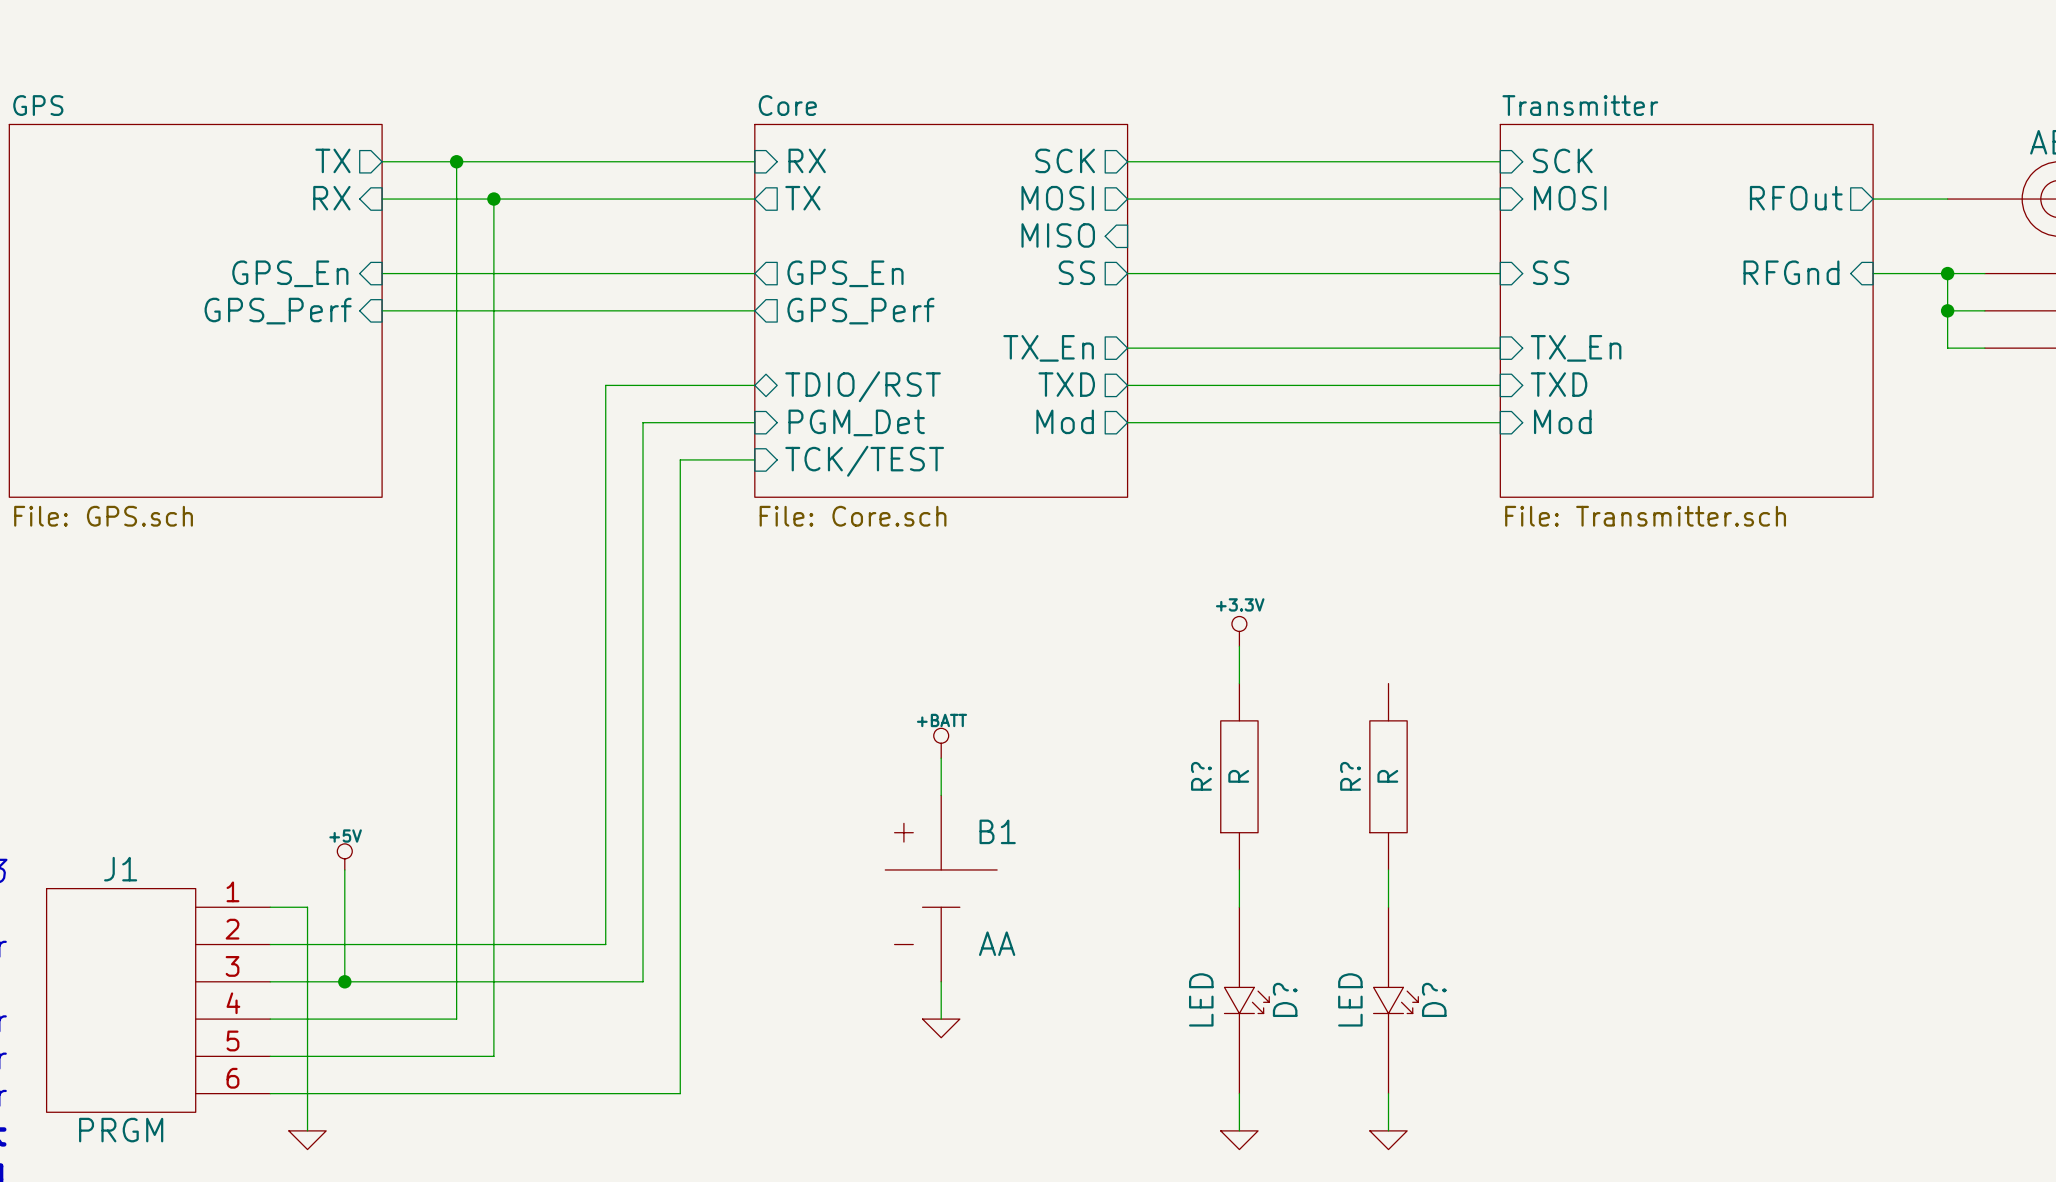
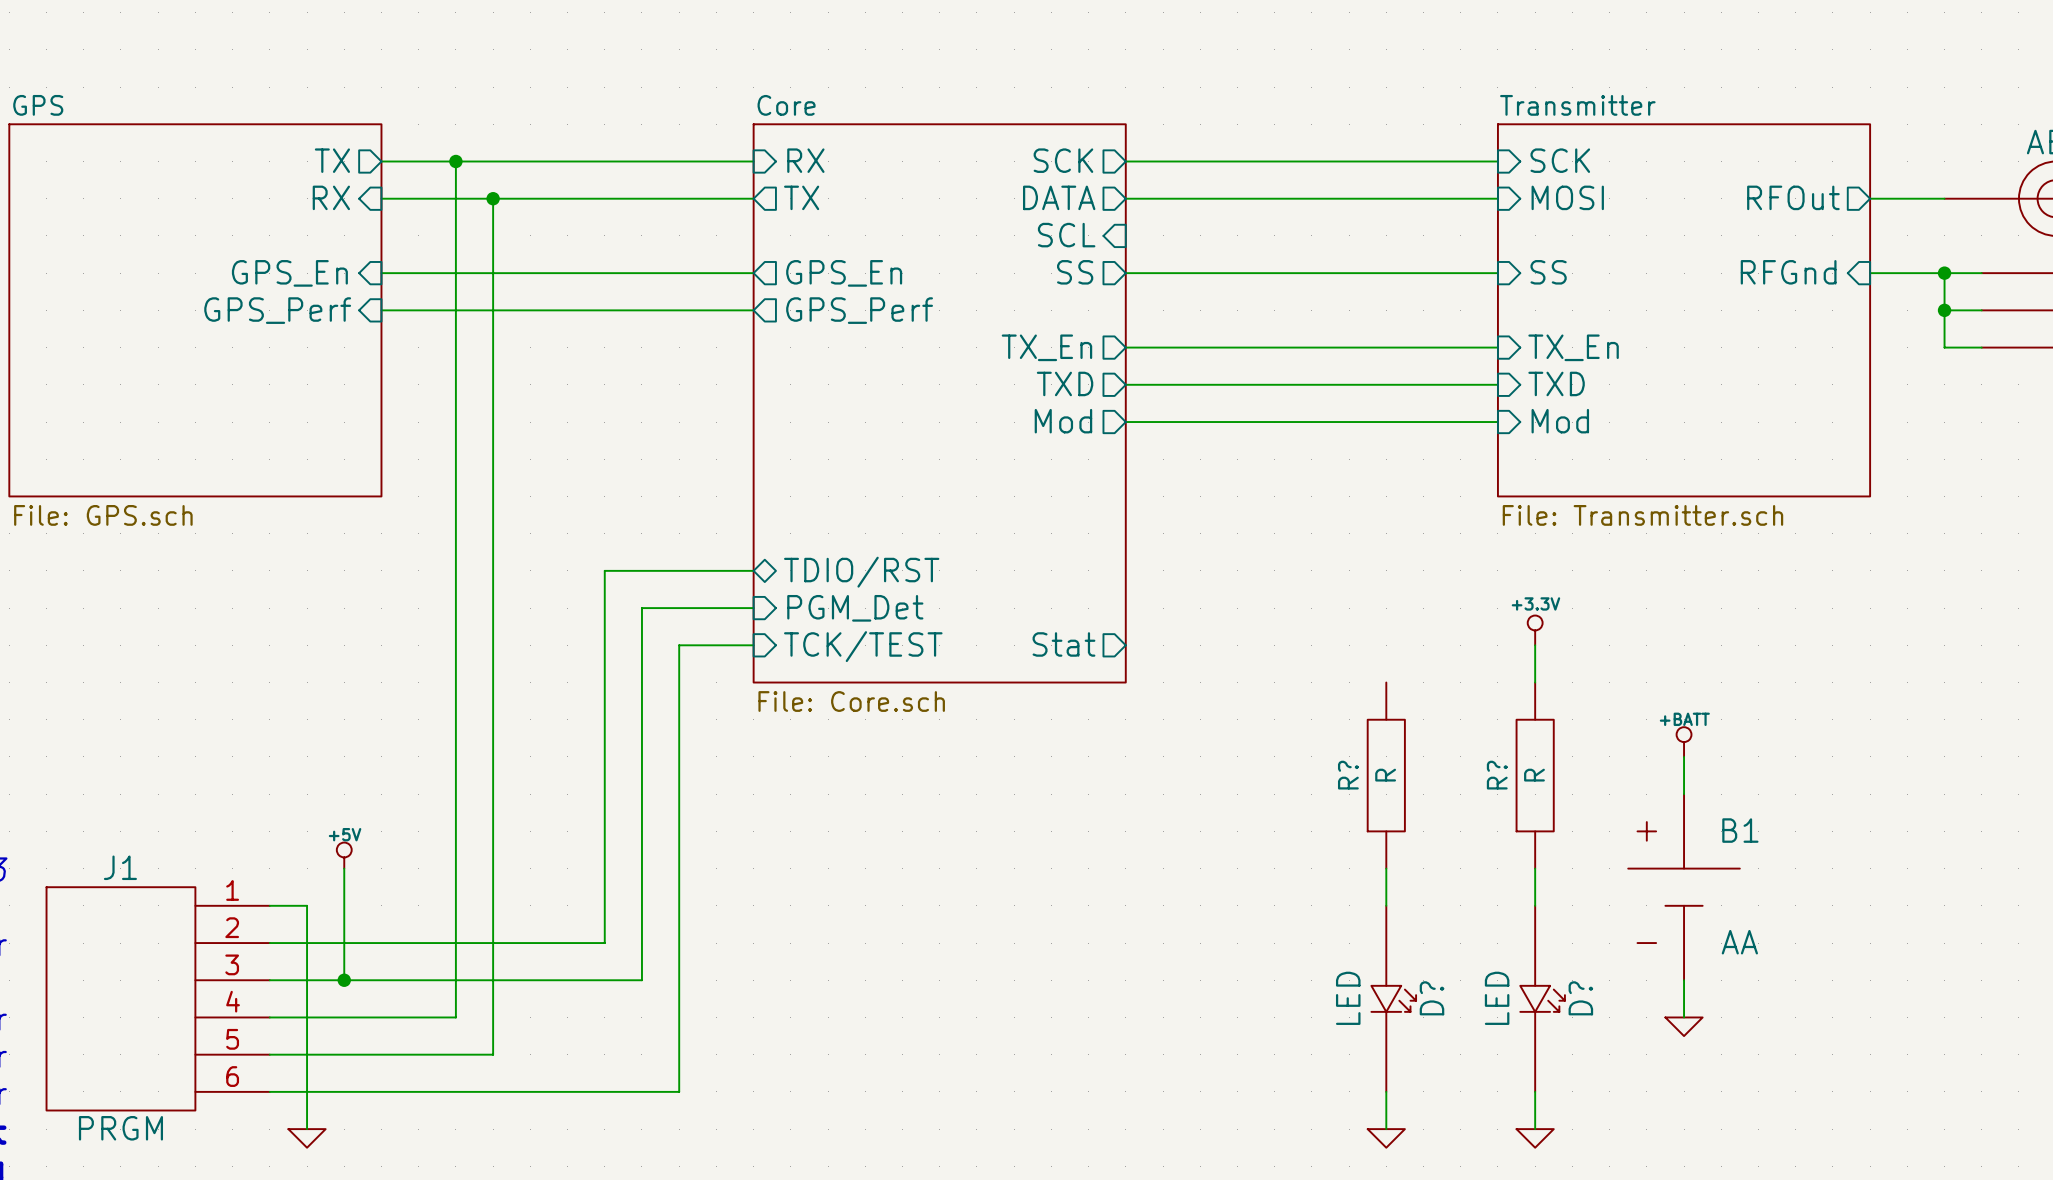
sheet pin: MOSI (1057, 198) -> DATA (1059, 197)
sheet pin: MISO (1058, 235) -> SCL (1066, 235)
sheet Core: File: Core.sch (941, 310) -> none
wire: (754, 385) (605, 385) (605, 571) -> (753, 570) (604, 570)
sheet pin position: TDIO/RST (863, 386) -> TDIO/RST (861, 572)
sheet Core: none -> File: Core.sch (939, 403)
wire: (754, 422) (643, 422) (643, 609) -> (753, 608) (641, 608)
sheet pin position: PGM_Det (856, 422) -> PGM_Det (855, 608)
wire: (754, 459) (680, 459) (680, 646) -> (753, 645) (679, 645)
sheet pin position: TCK/TEST (864, 461) -> TCK/TEST (863, 646)
power symbol position: +3.3V (1239, 631) -> +3.3V (1535, 630)
sheet pin: none -> Stat (1063, 644)
wire: (1239, 646) (1239, 683) -> (1535, 645) (1535, 682)
power symbol: +BATT (941, 743) -> none
power symbol: none -> +BATT (1684, 742)
wire: (941, 758) (941, 795) -> none
wire: none -> (1684, 756) (1684, 794)
R? position: (1239, 776) -> (1535, 775)
wire: (1239, 869) (1239, 907) -> (1535, 868) (1535, 905)
B1 position: (941, 888) -> (1684, 887)
wire: (941, 981) (941, 1019) -> none
wire: none -> (1684, 980) (1684, 1017)
D? position: (1246, 1000) -> (1542, 998)
power symbol: (941, 1028) -> none
power symbol: none -> (1684, 1026)
wire: (1239, 1093) (1239, 1130) -> (1535, 1091) (1535, 1129)
power symbol: (1239, 1140) -> none
power symbol: none -> (1535, 1138)

